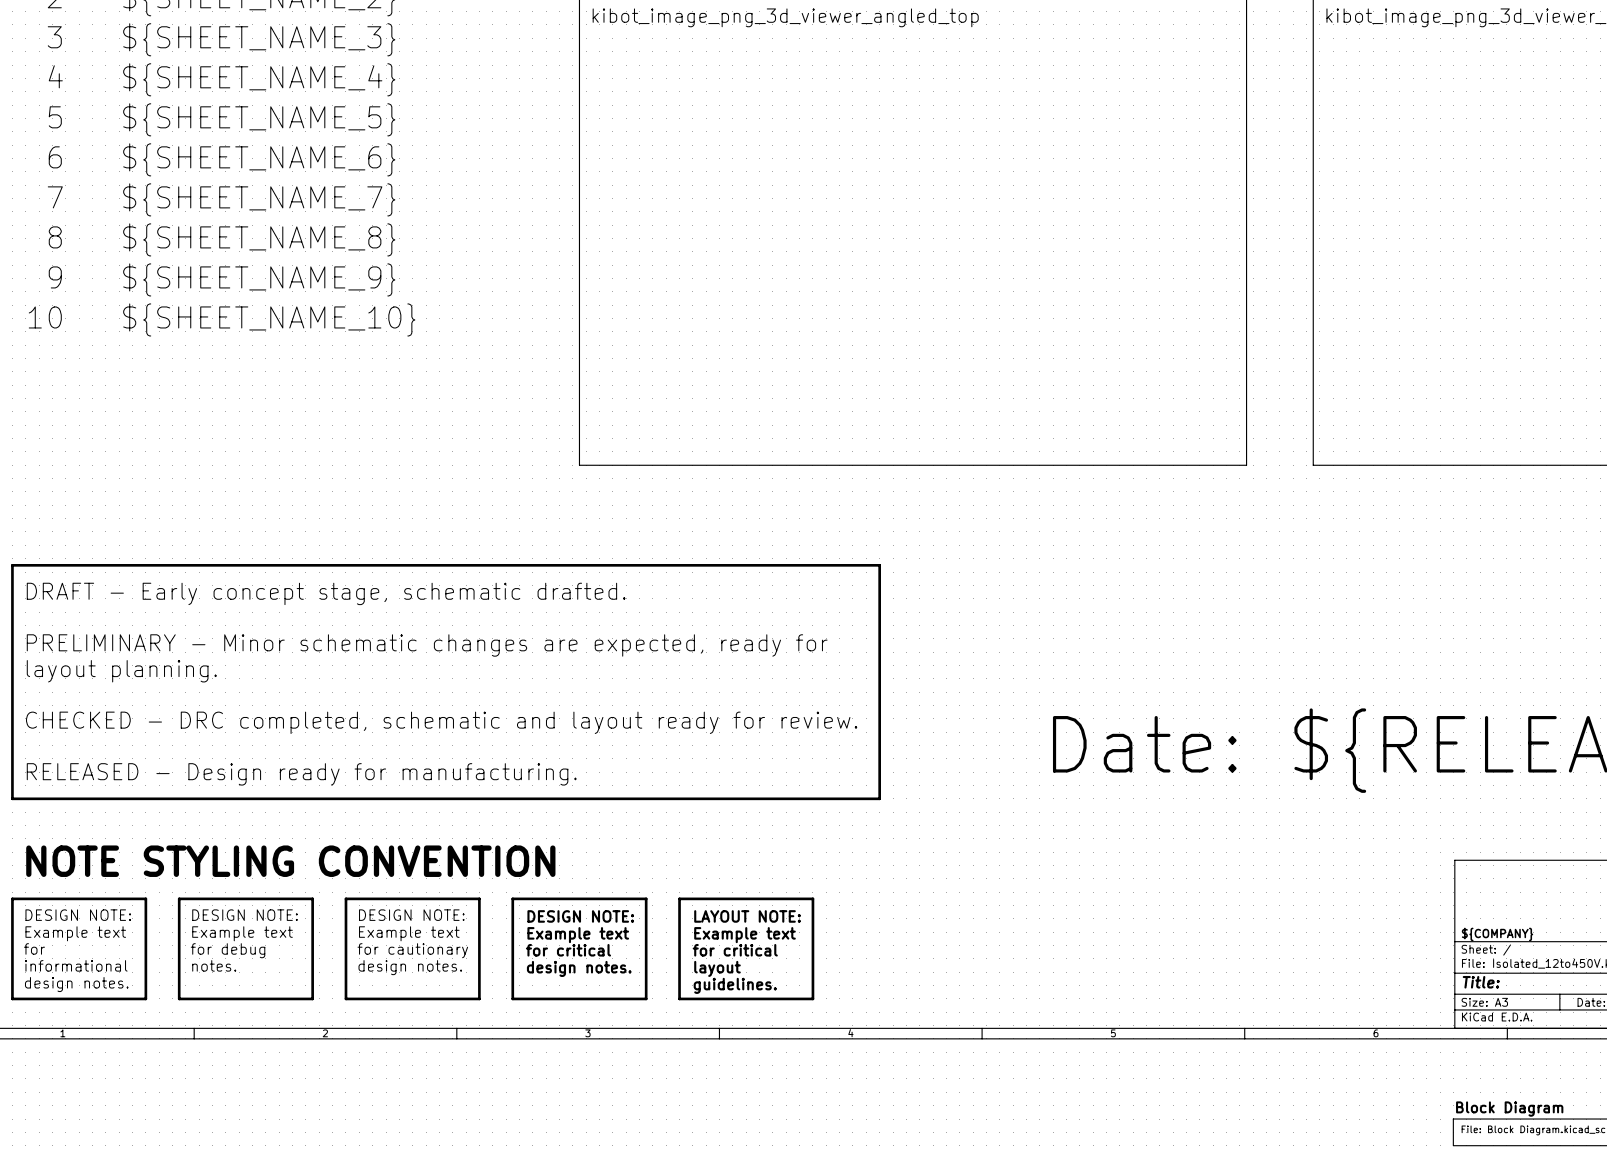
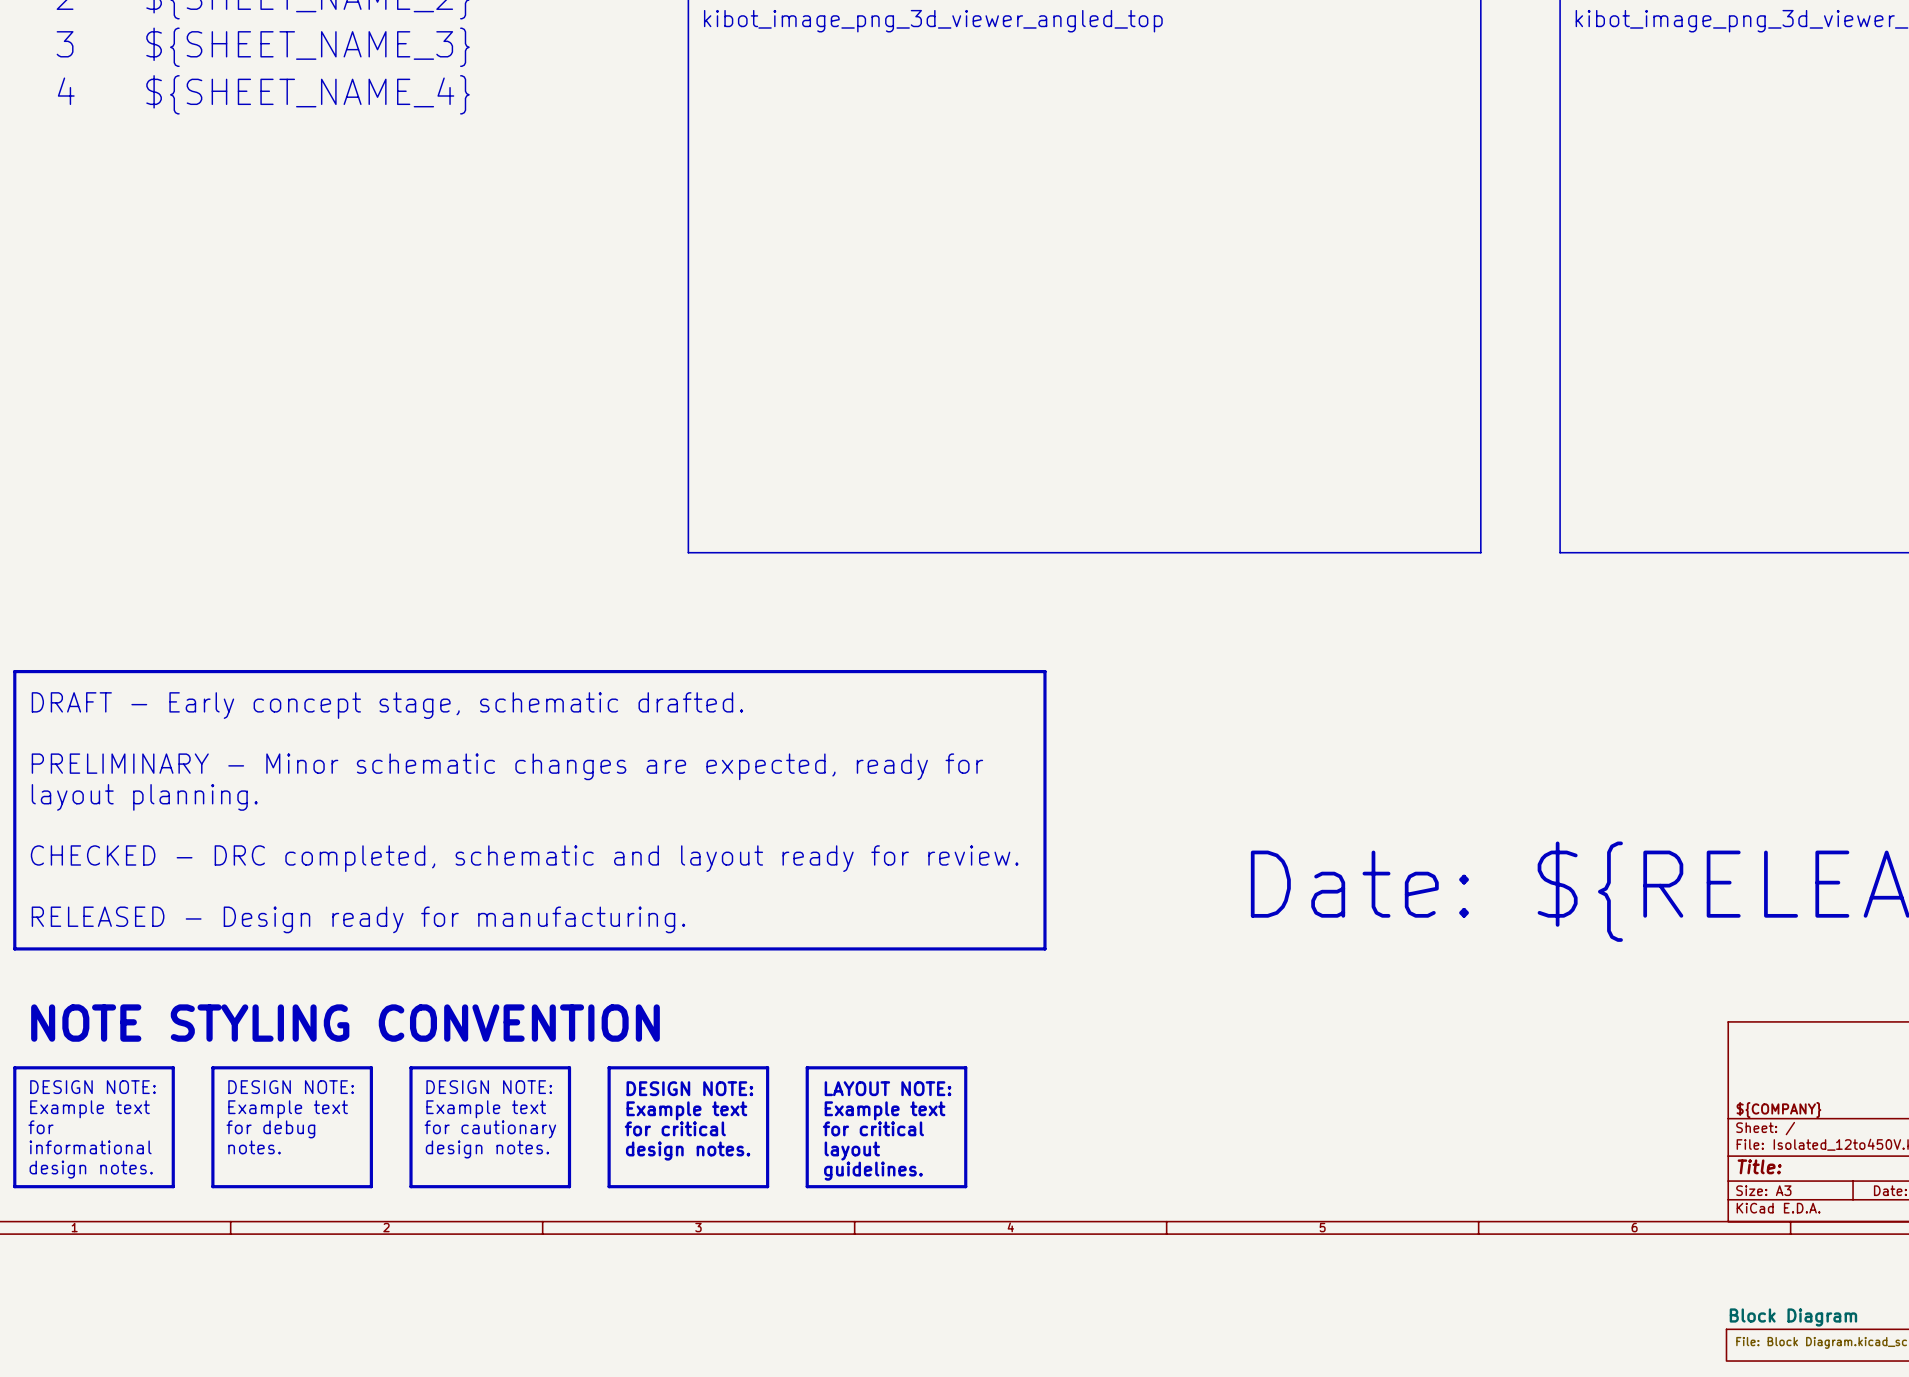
text: 5 (55, 117) -> none
text: ${SHEET_NAME_5} (259, 119) -> none
text: 6 (55, 157) -> none
text: ${SHEET_NAME_6} (259, 159) -> none
text: 7 (55, 197) -> none
text: ${SHEET_NAME_7} (259, 199) -> none
text: 8 (55, 237) -> none
text: ${SHEET_NAME_8} (259, 239) -> none
text: 9 (55, 277) -> none
text: ${SHEET_NAME_9} (259, 279) -> none
text: 10 (45, 317) -> none
text: ${SHEET_NAME_10} (269, 319) -> none

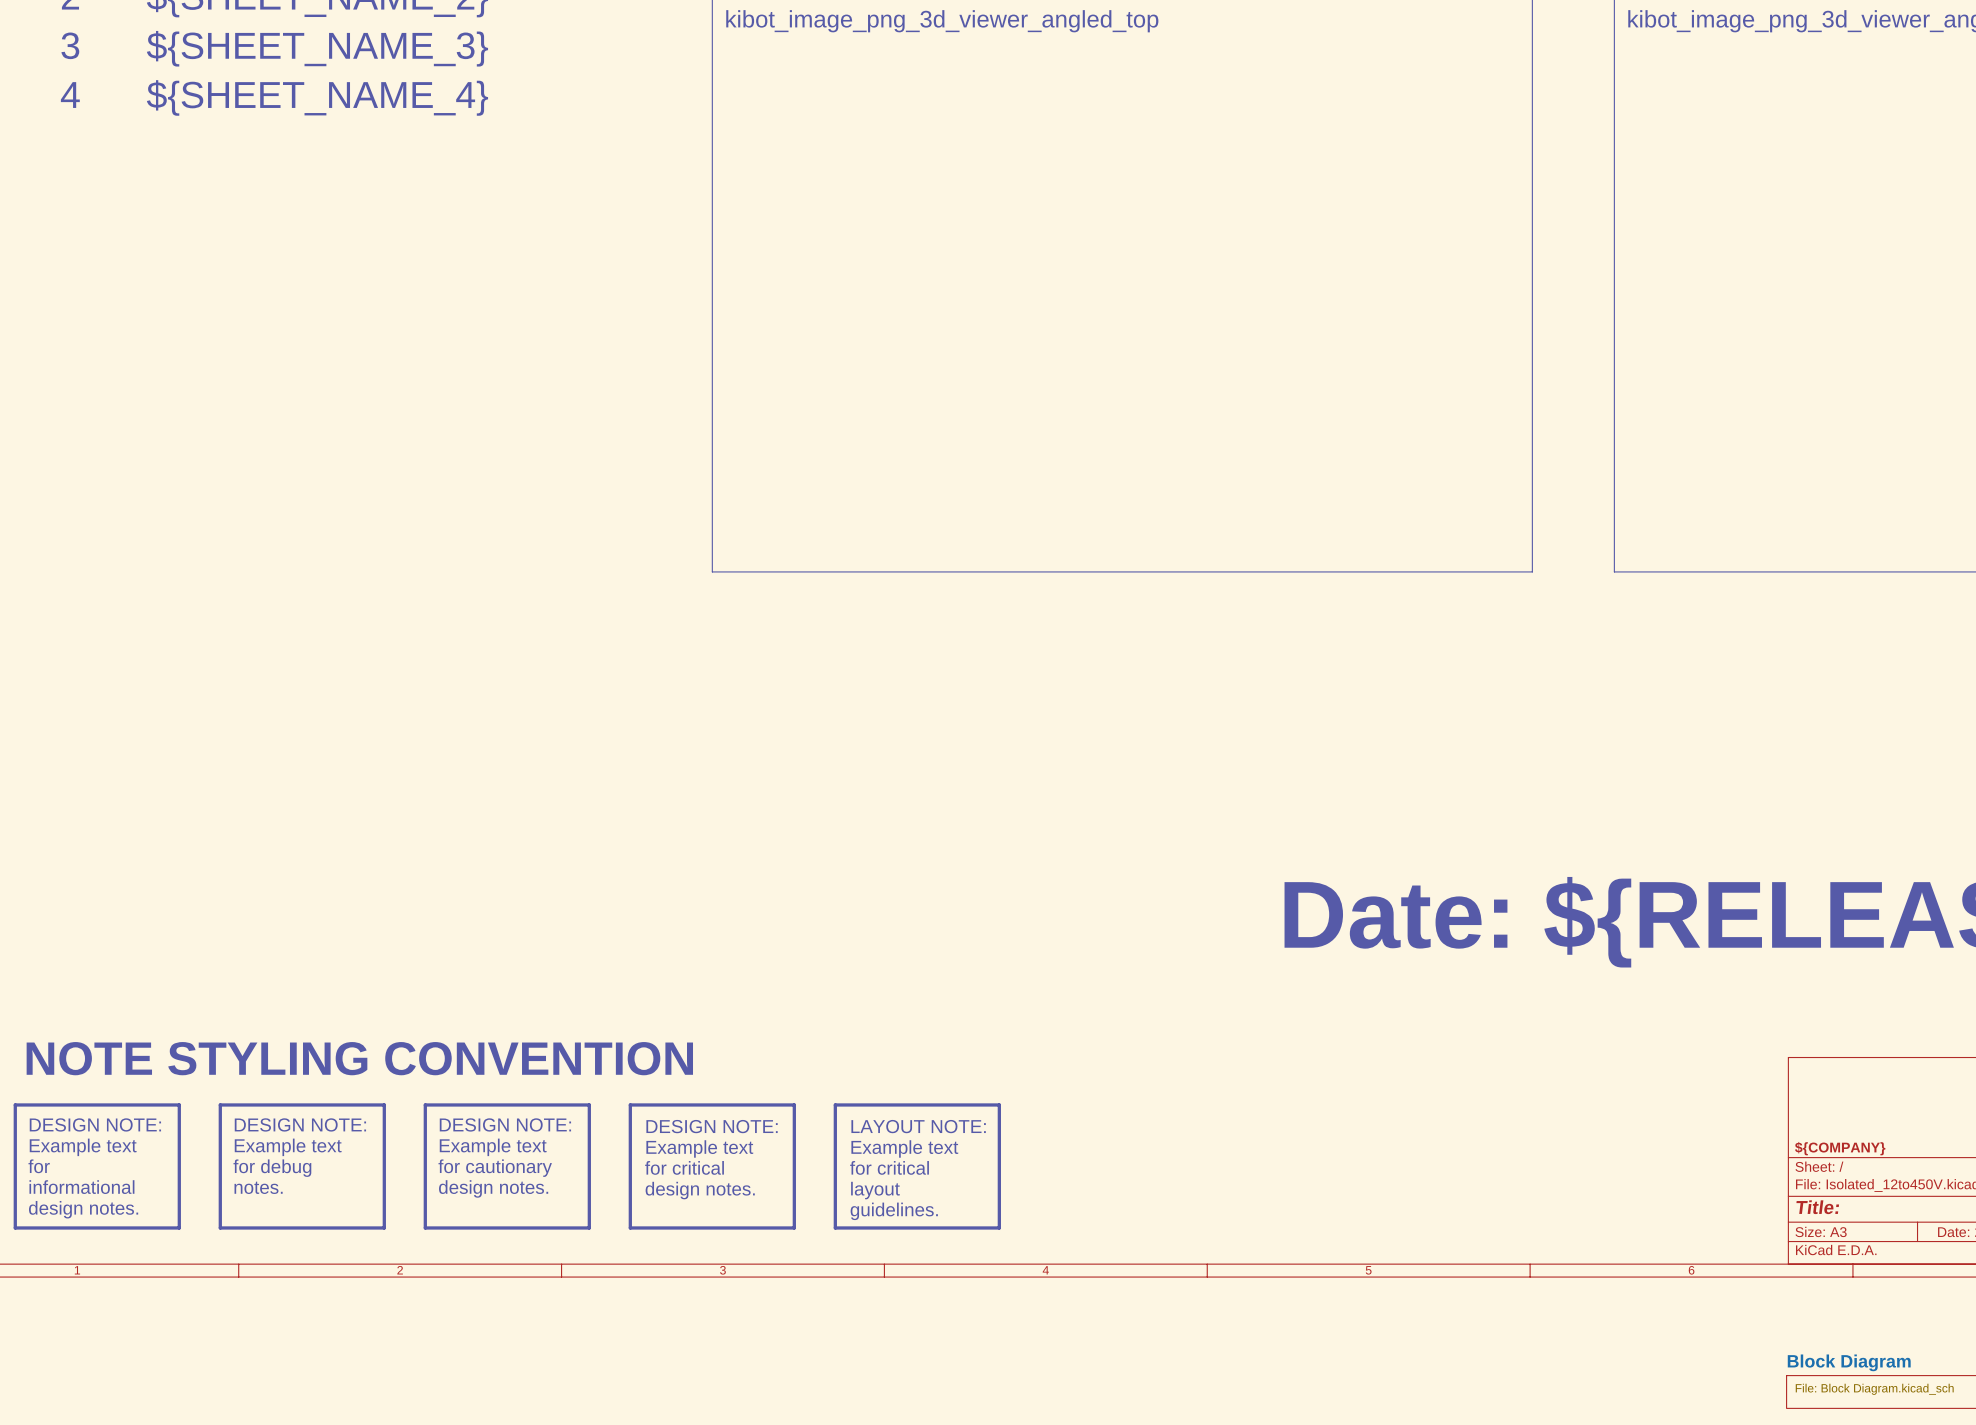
line: (14, 671) (1044, 671) (1044, 948) (14, 948) (14, 671) -> none
text: DRAFT - Early concept stage, schematic drafted. (387, 705) -> none
text: PRELIMINARY - Minor schematic changes are expected, ready for (507, 766) -> none
text: layout planning. (144, 797) -> none
text: CHECKED - DRC completed, schematic and layout ready for review. (524, 858) -> none
text: RELEASED - Design ready for manufacturing. (358, 919) -> none

